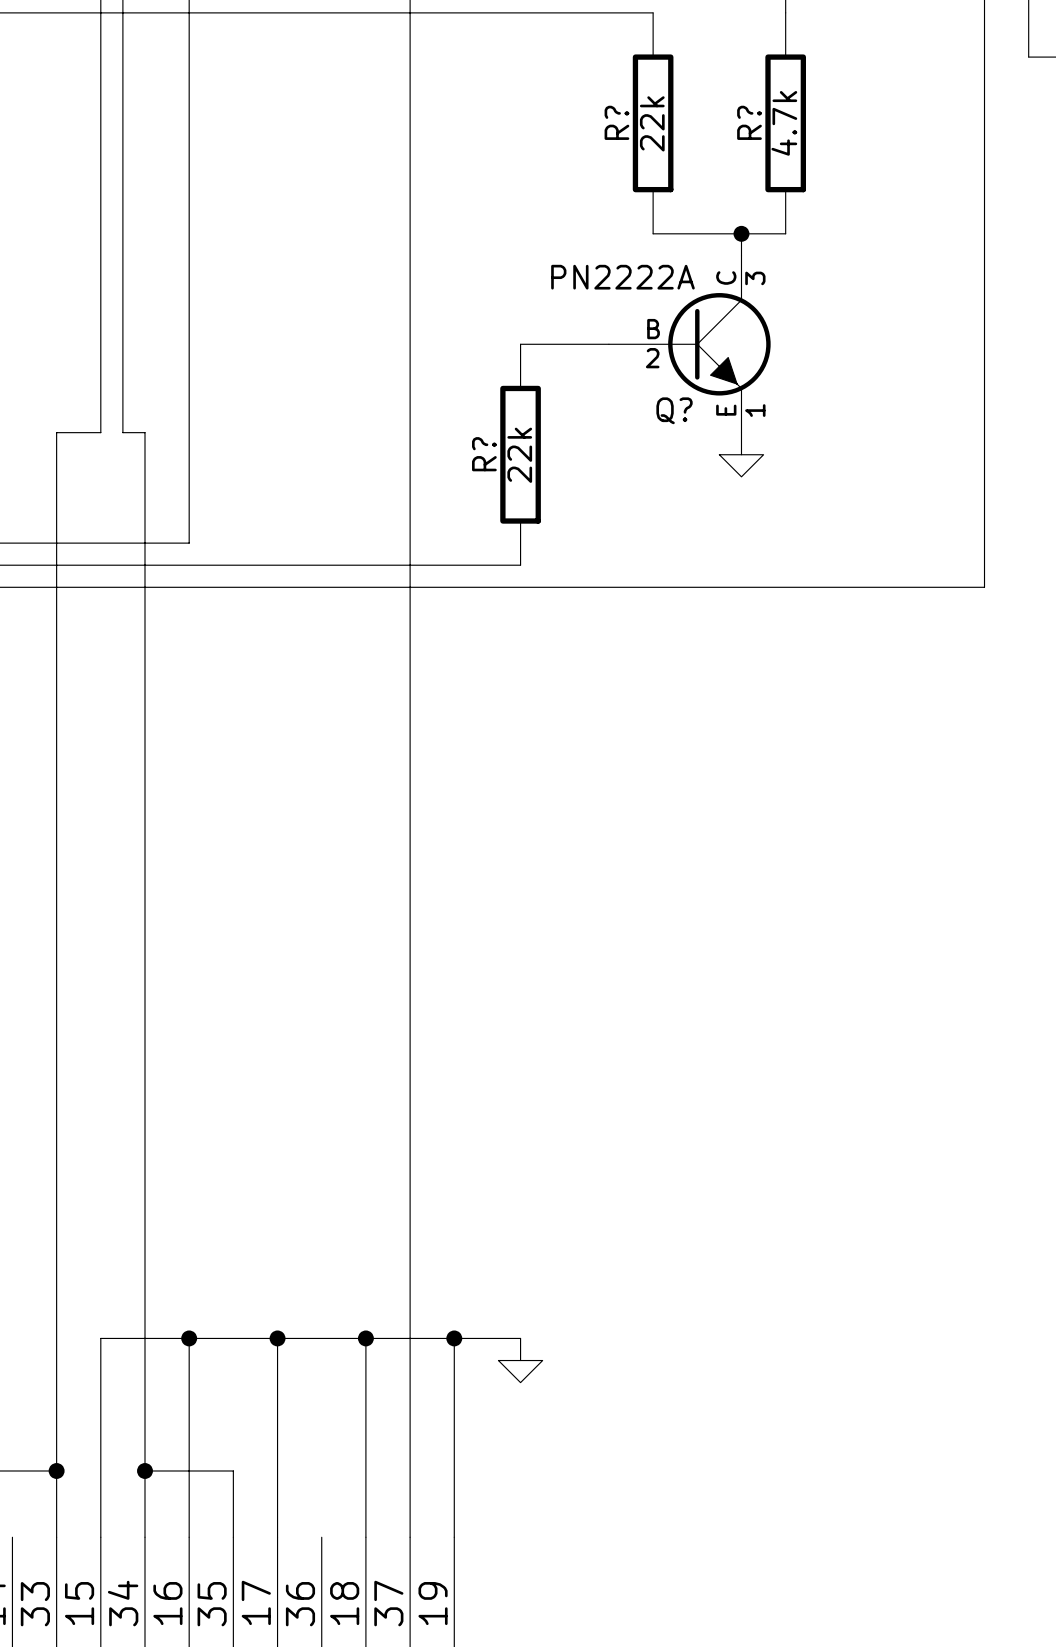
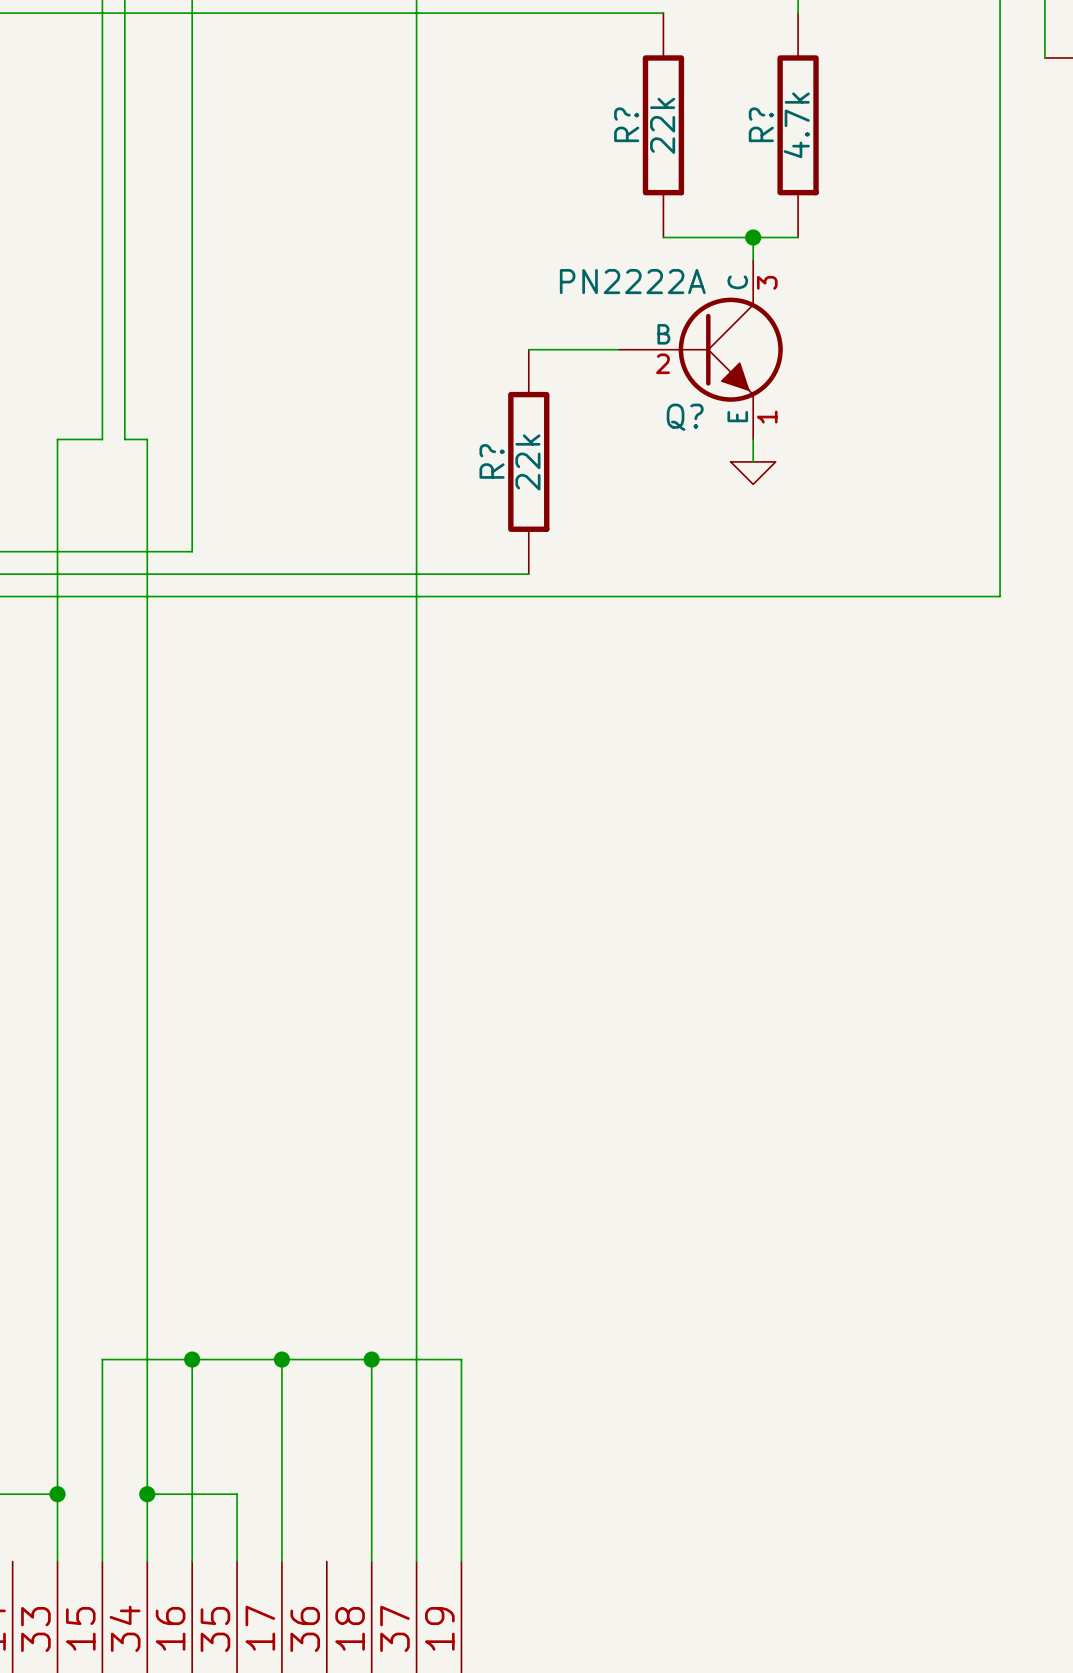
wire: (454, 1338) (520, 1338) (520, 1360) -> none
junction: (454, 1338) -> none
power symbol: (520, 1371) -> none

